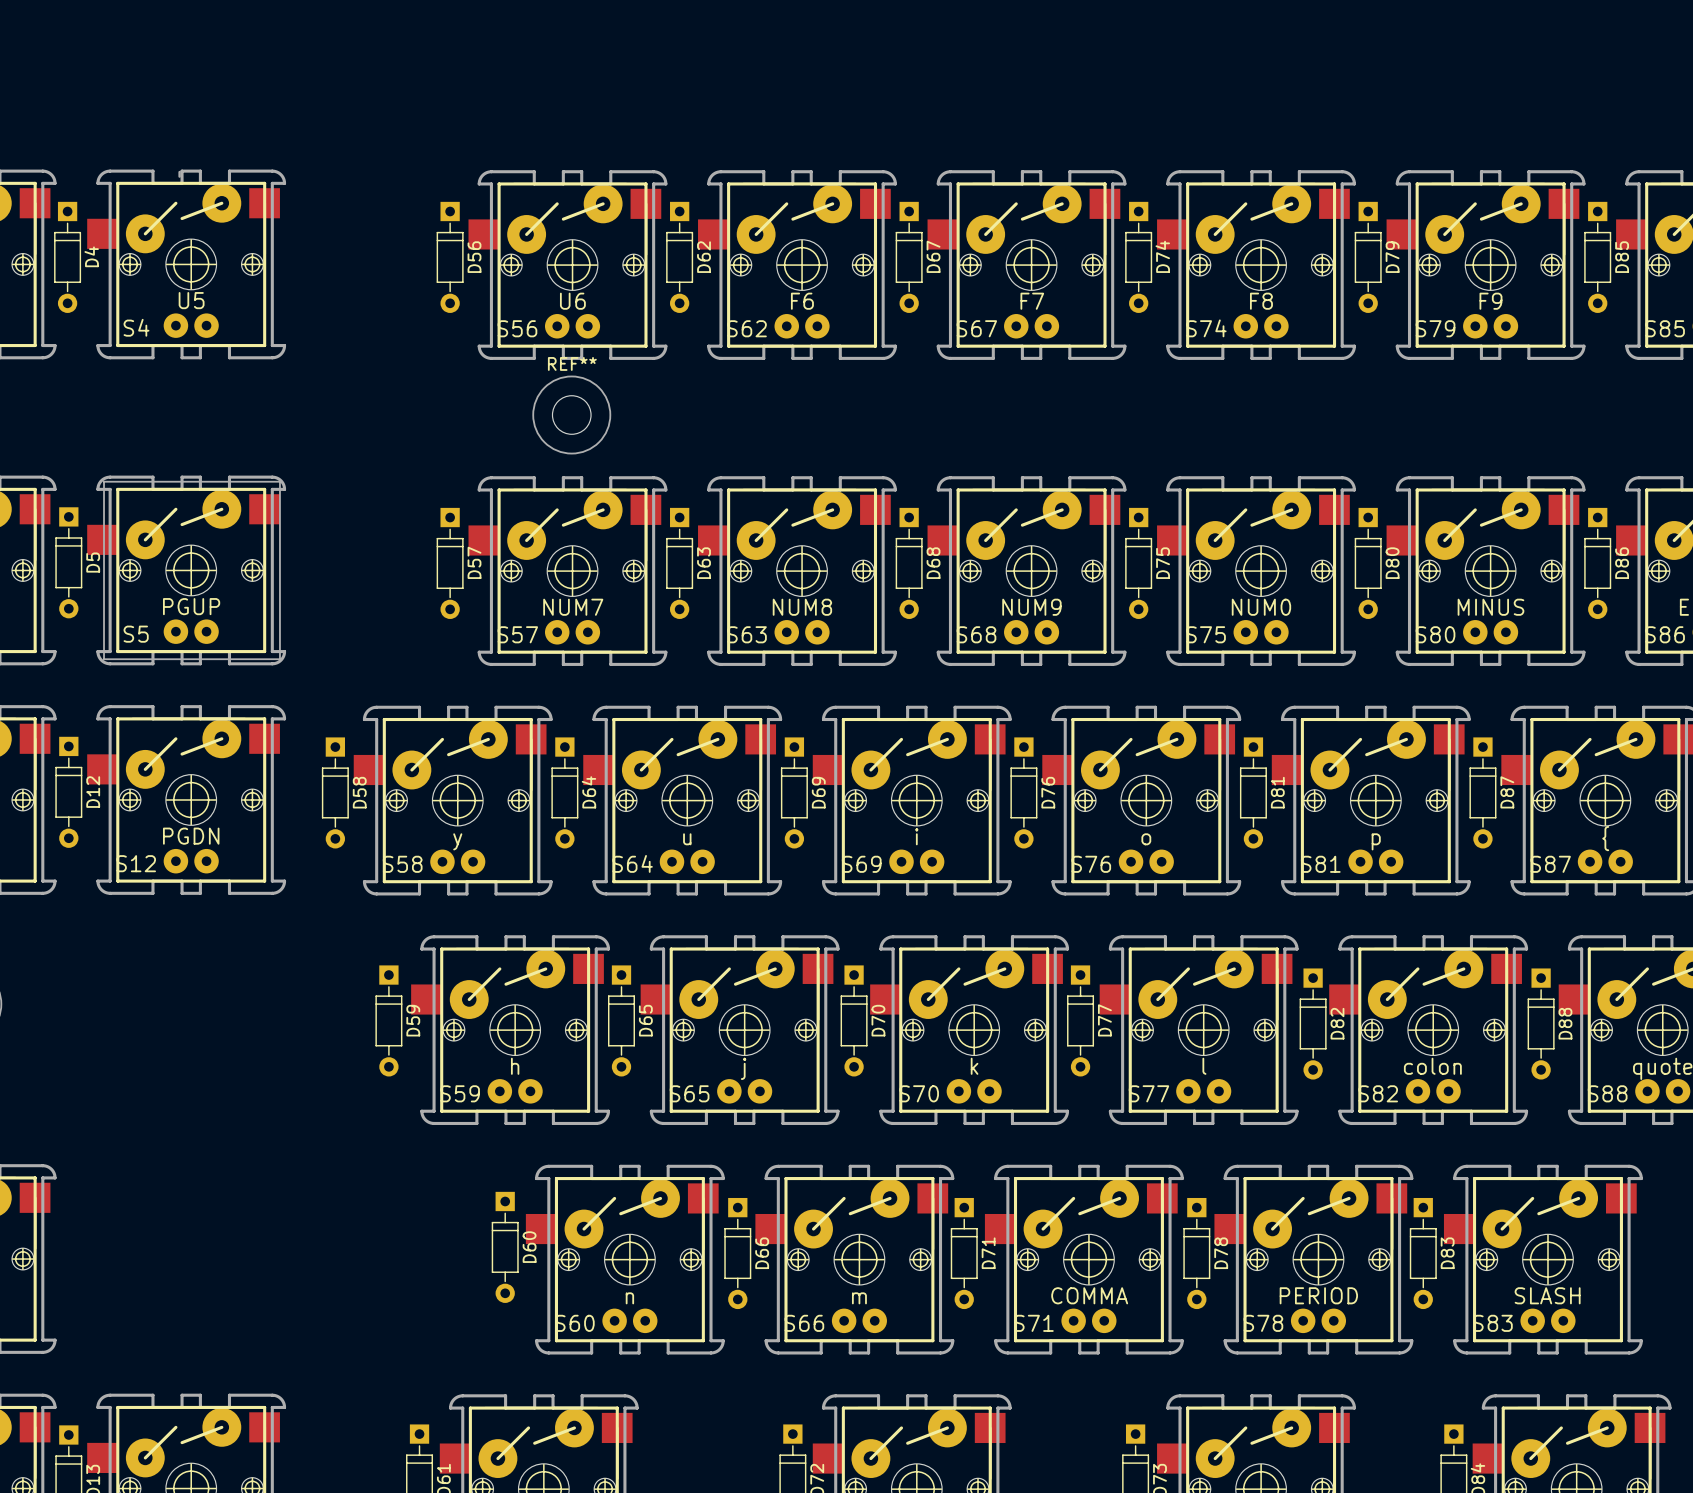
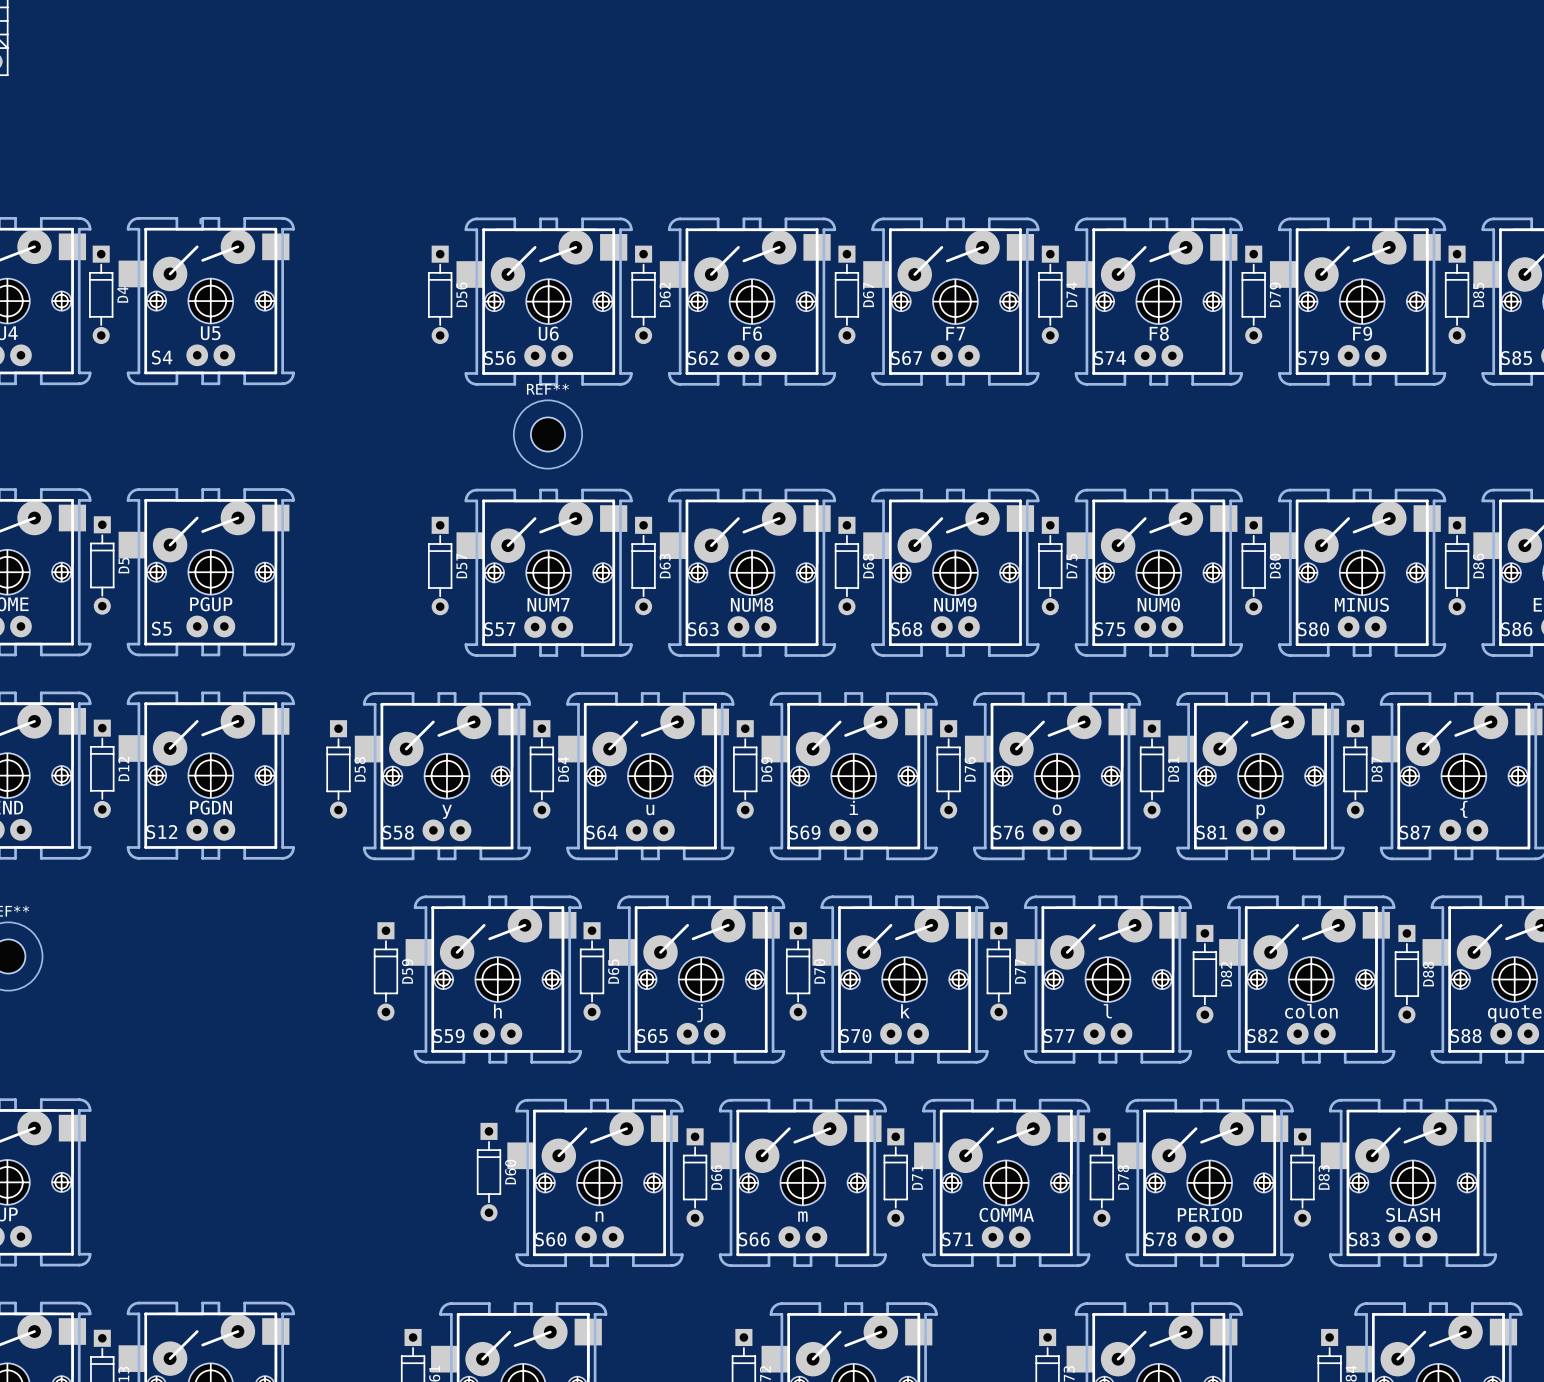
S5 footprint: [87, 475, 287, 666] -> [118, 488, 295, 657]

